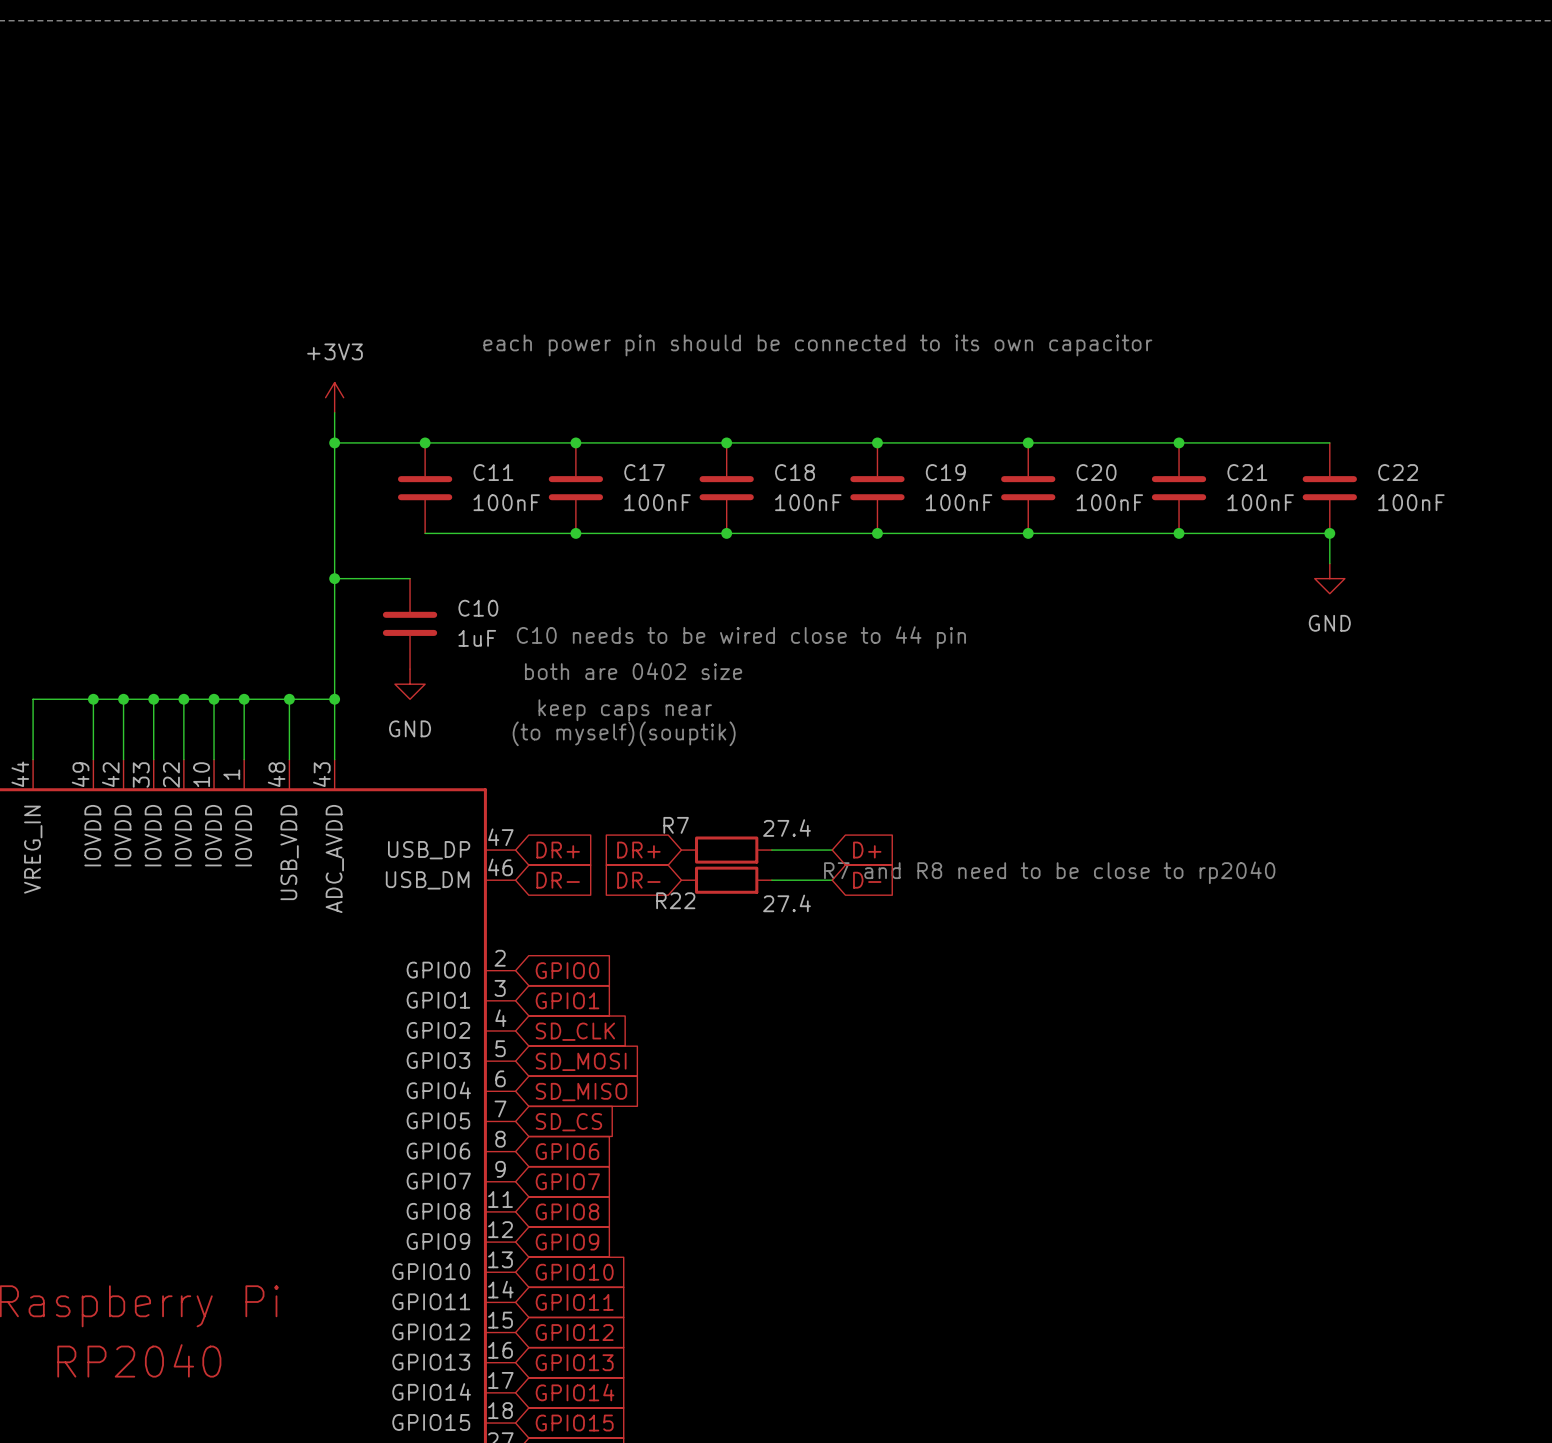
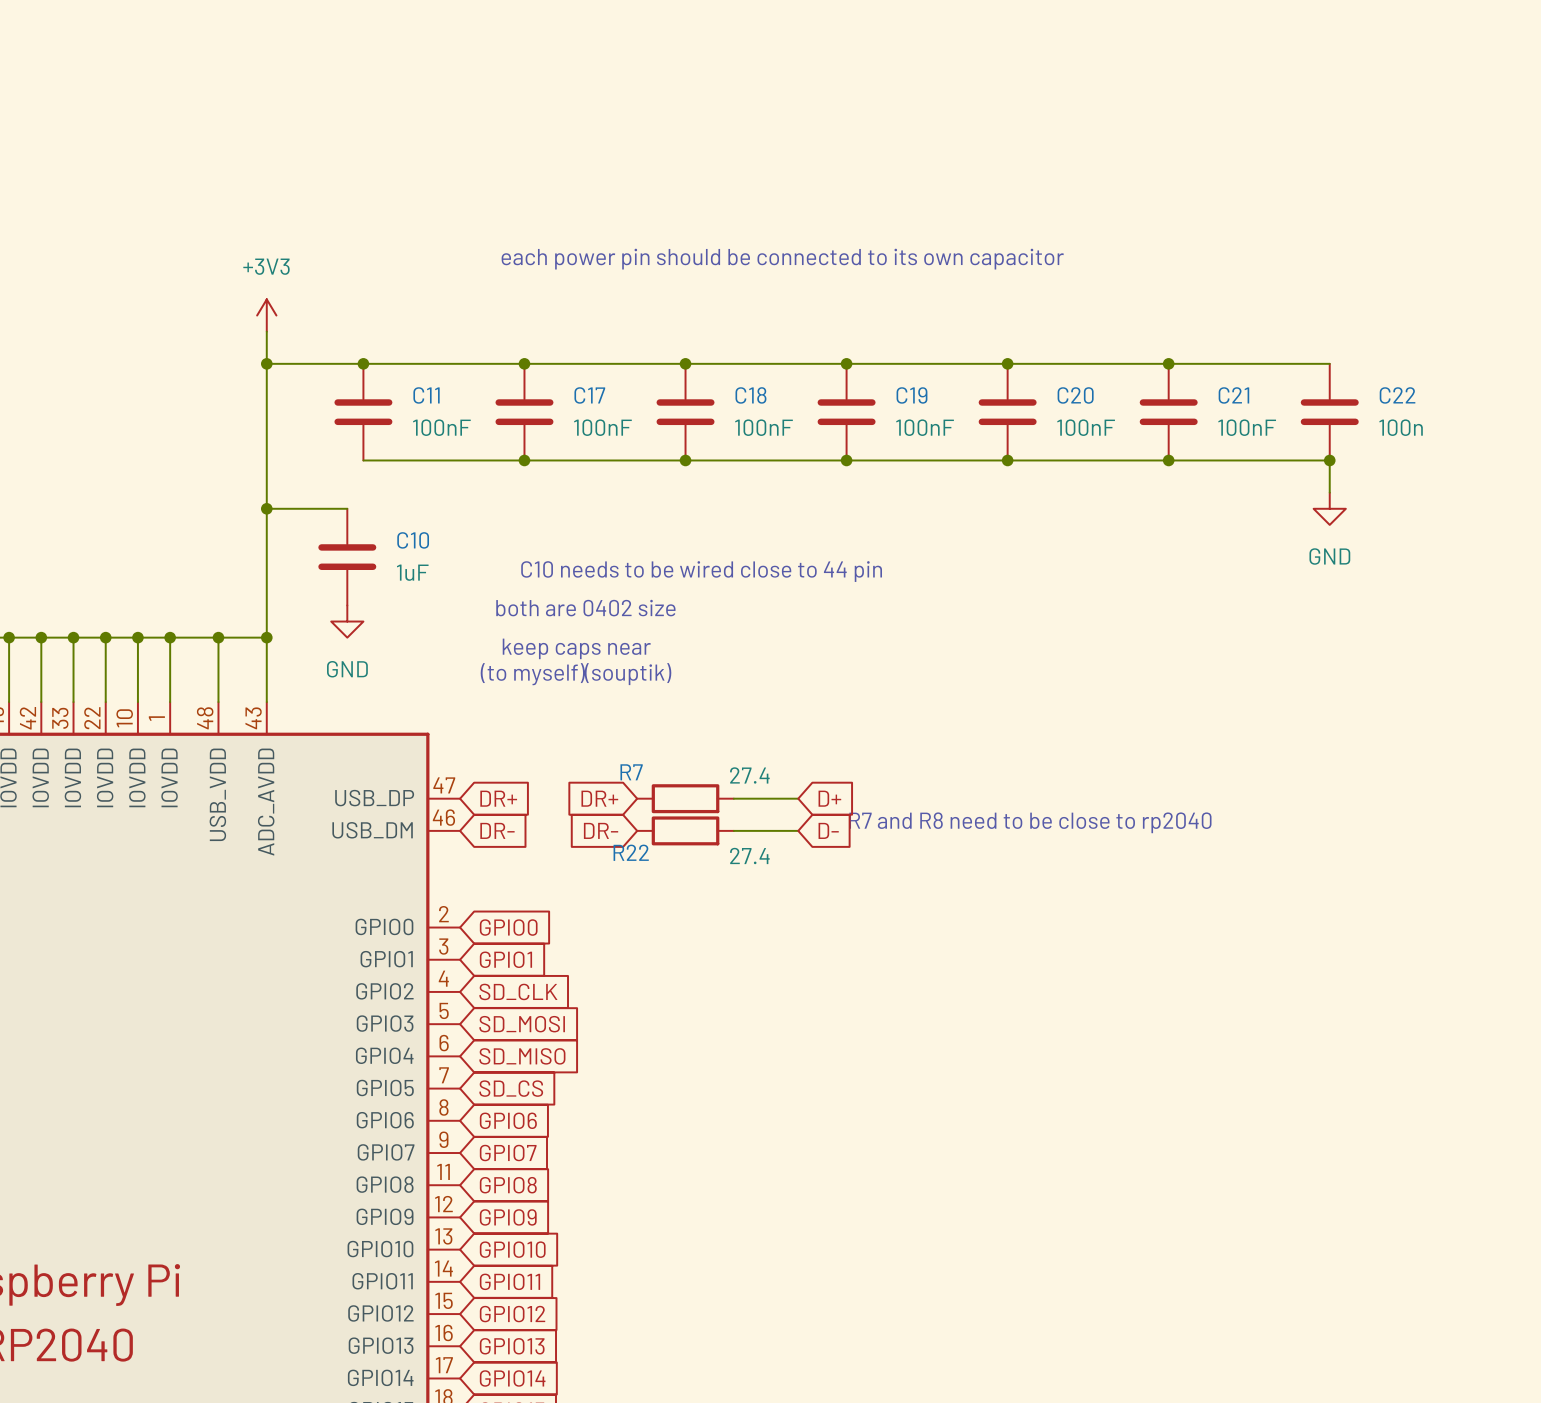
C22 value: 100nF (1411, 502) -> 100n (1401, 427)

